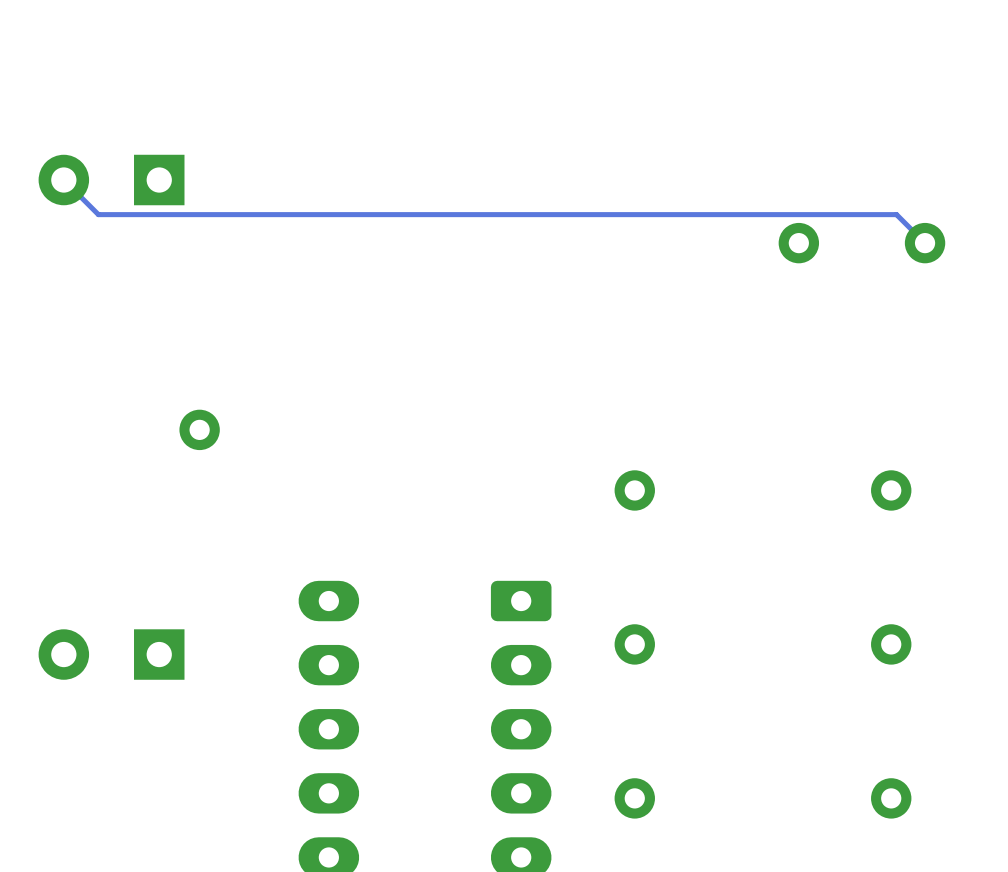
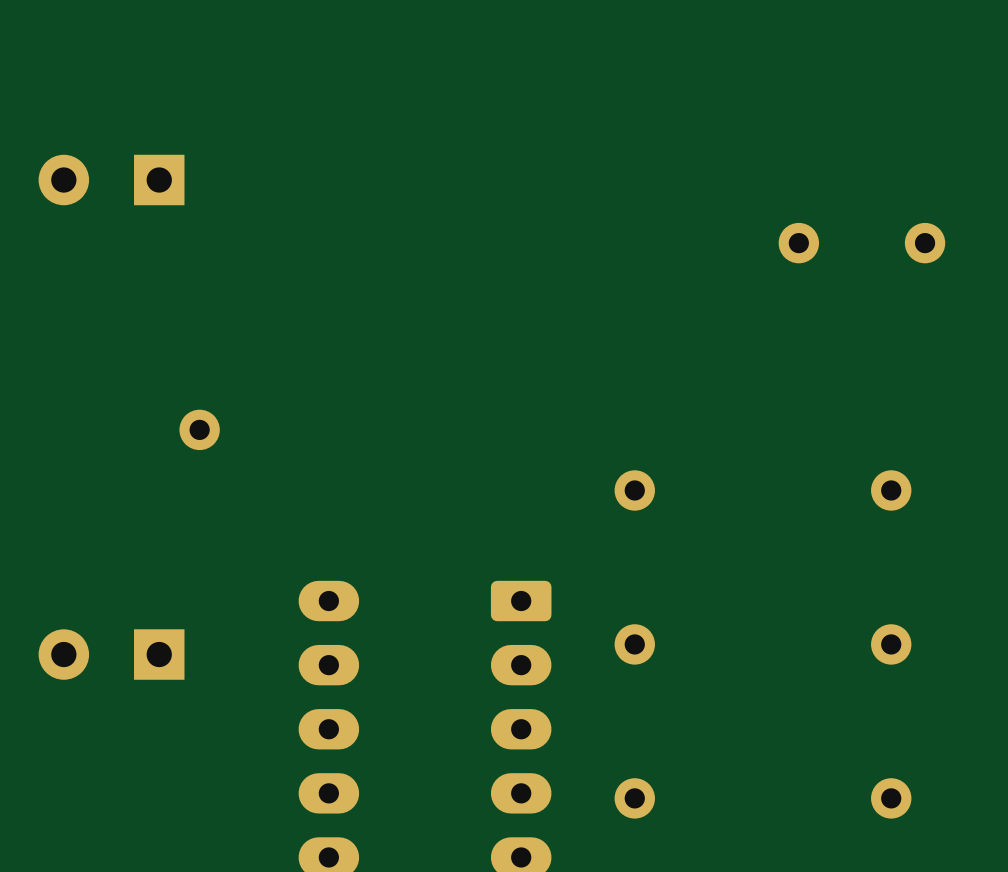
track: (63, 180) (98, 214) (896, 214) (925, 243) -> none

